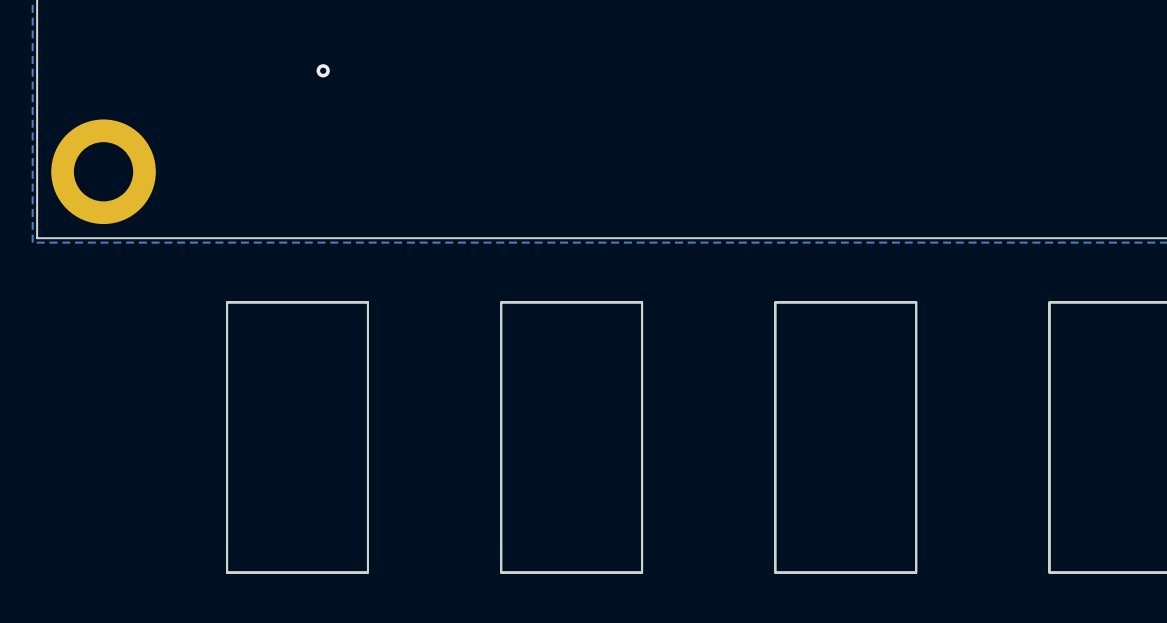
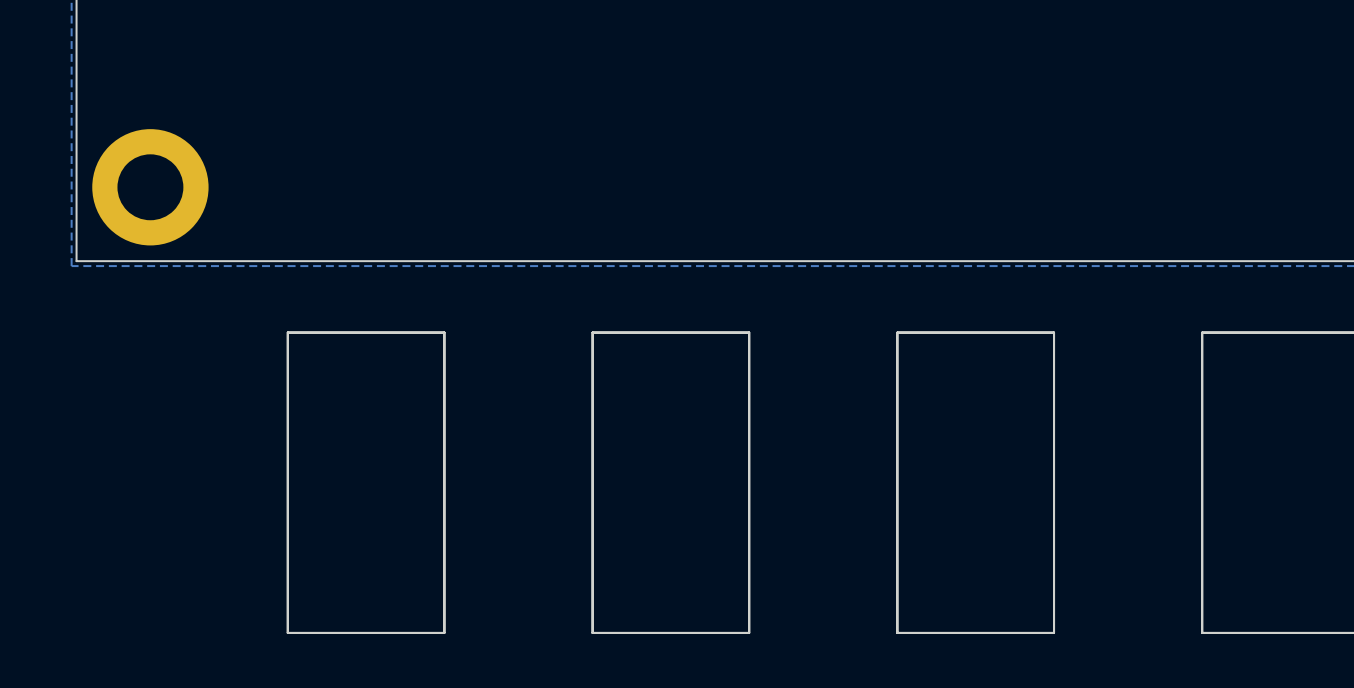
via: (323, 70) -> none

